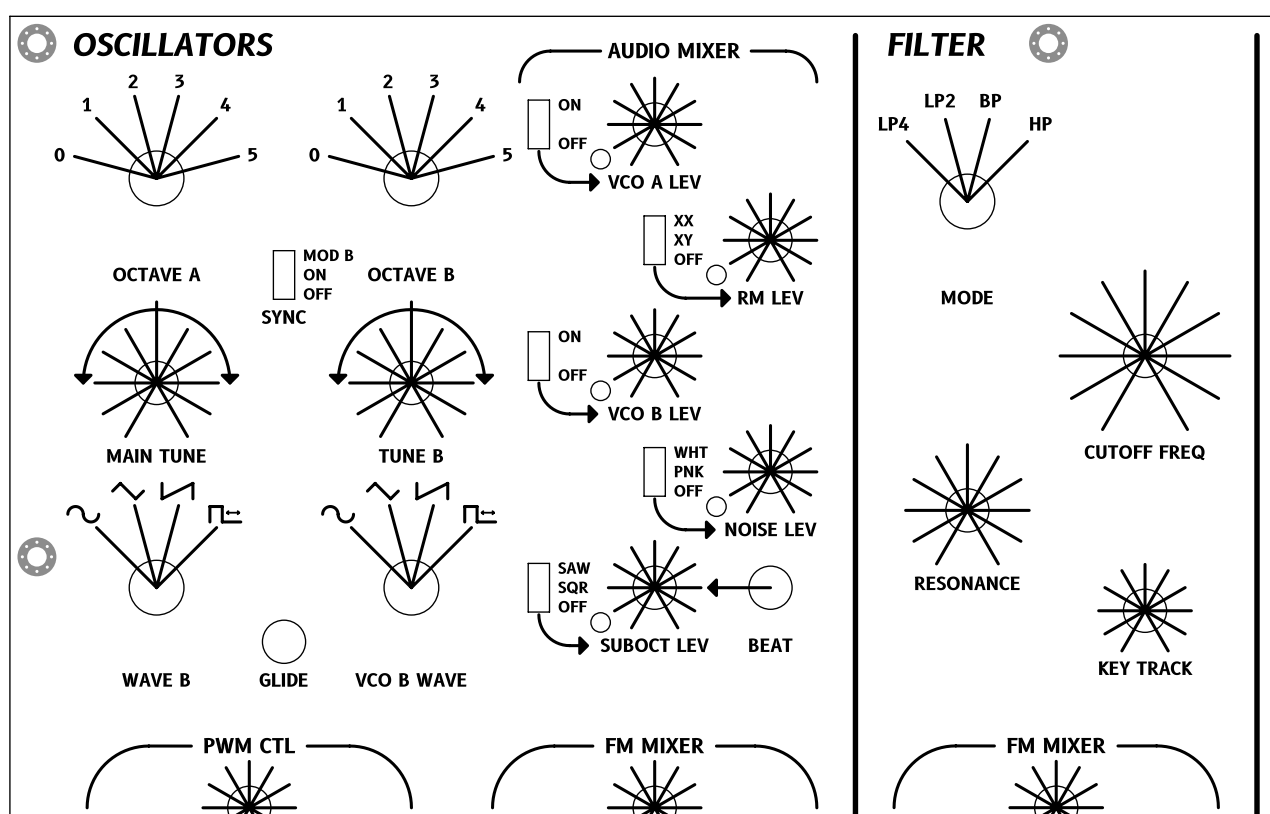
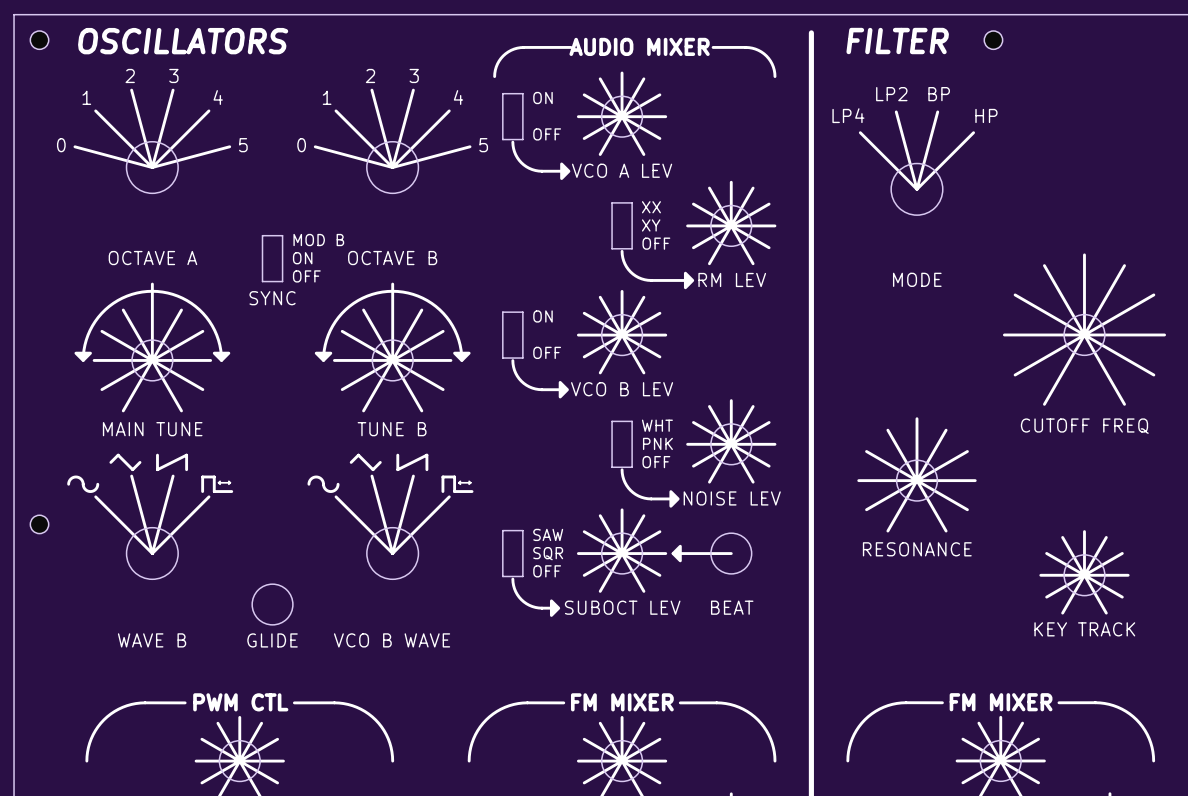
part footprint: [17, 23, 57, 63] -> [30, 30, 49, 50]
part footprint: [1029, 23, 1068, 63] -> [984, 30, 1003, 50]
round board edge: [590, 149, 611, 170] -> none
round board edge: [706, 265, 727, 285] -> none
round board edge: [590, 380, 611, 401] -> none
round board edge: [706, 496, 727, 517] -> none
part footprint: [17, 537, 57, 577] -> [30, 515, 49, 534]
round board edge: [590, 612, 611, 633] -> none

